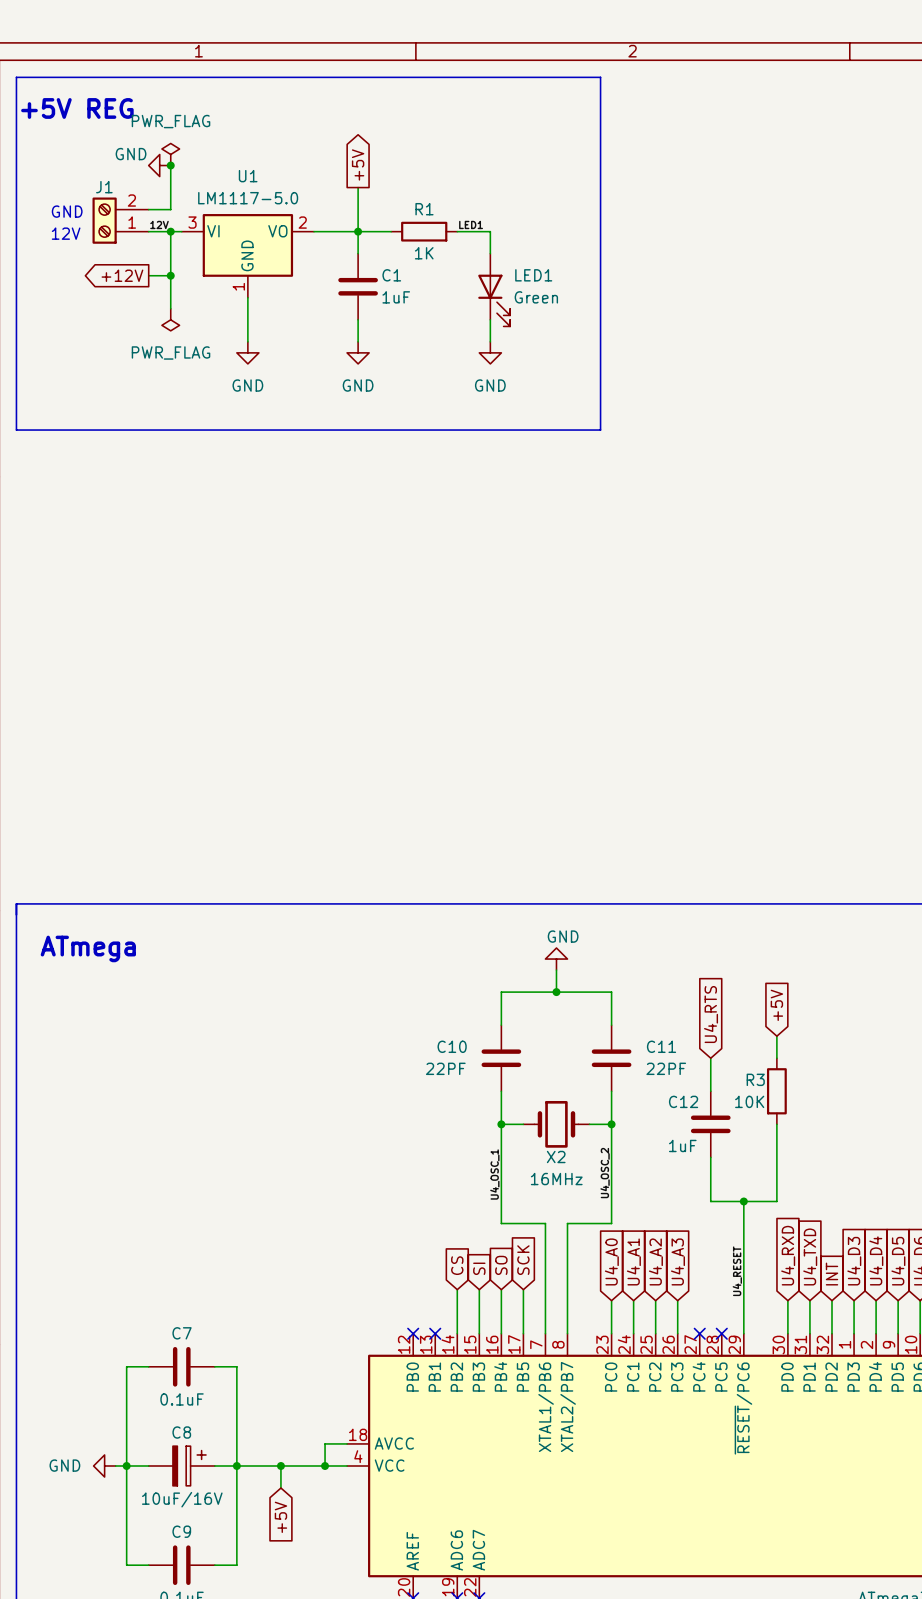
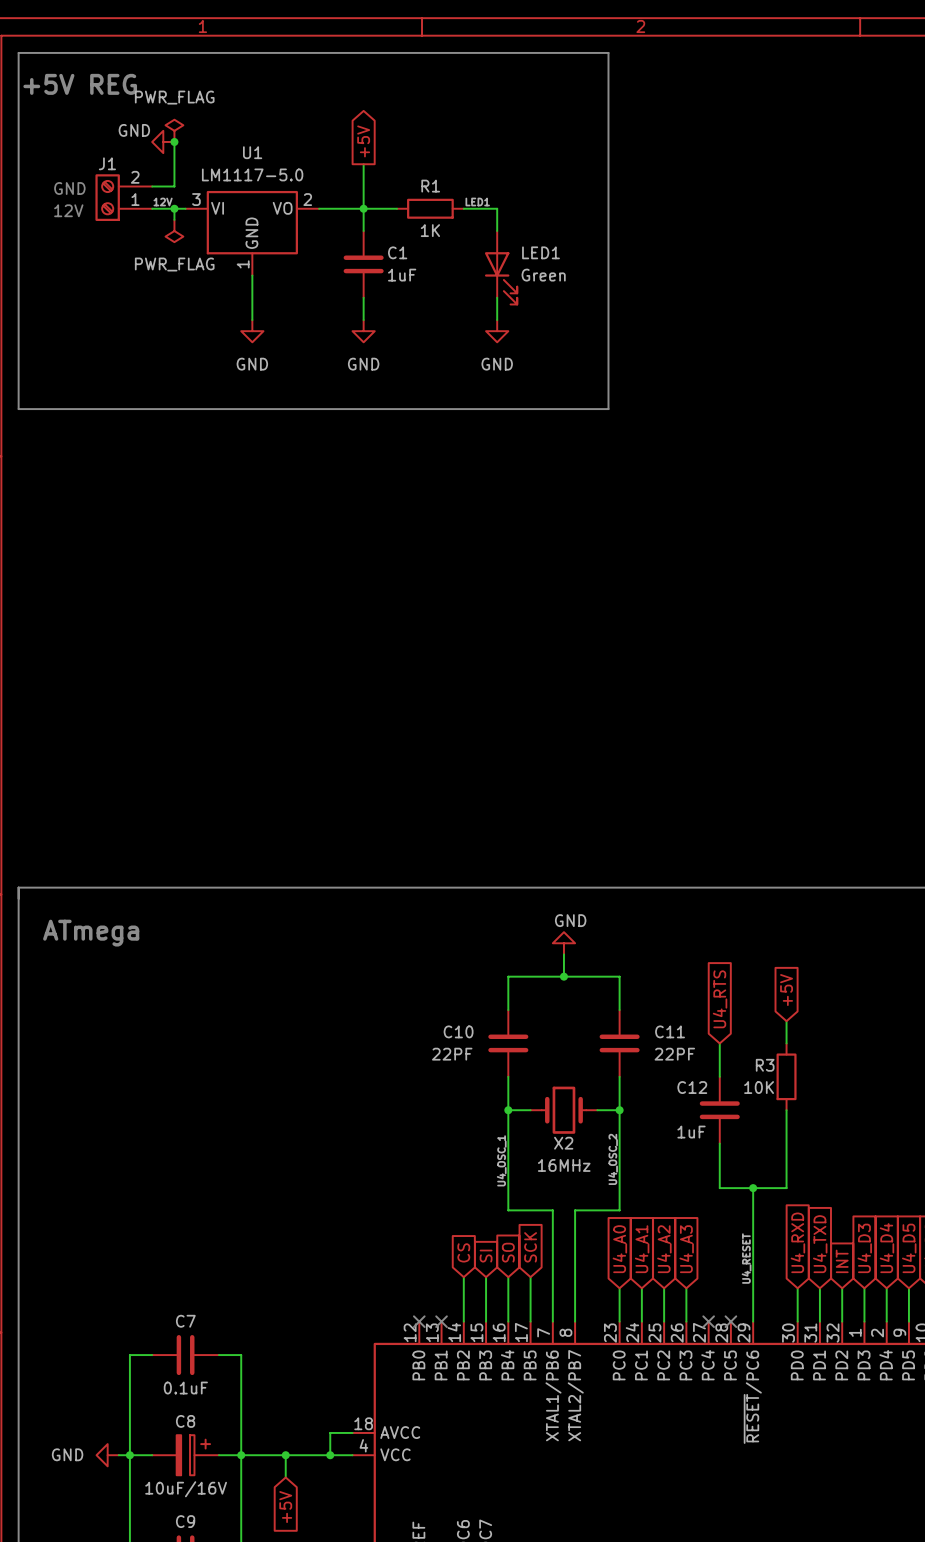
wire: (170, 242) (170, 308) -> none
global label: +12V (122, 275) -> none
wire: (148, 275) (170, 275) -> none
junction: (170, 275) -> none
power symbol position: PWR_FLAG (170, 319) -> PWR_FLAG (174, 231)

